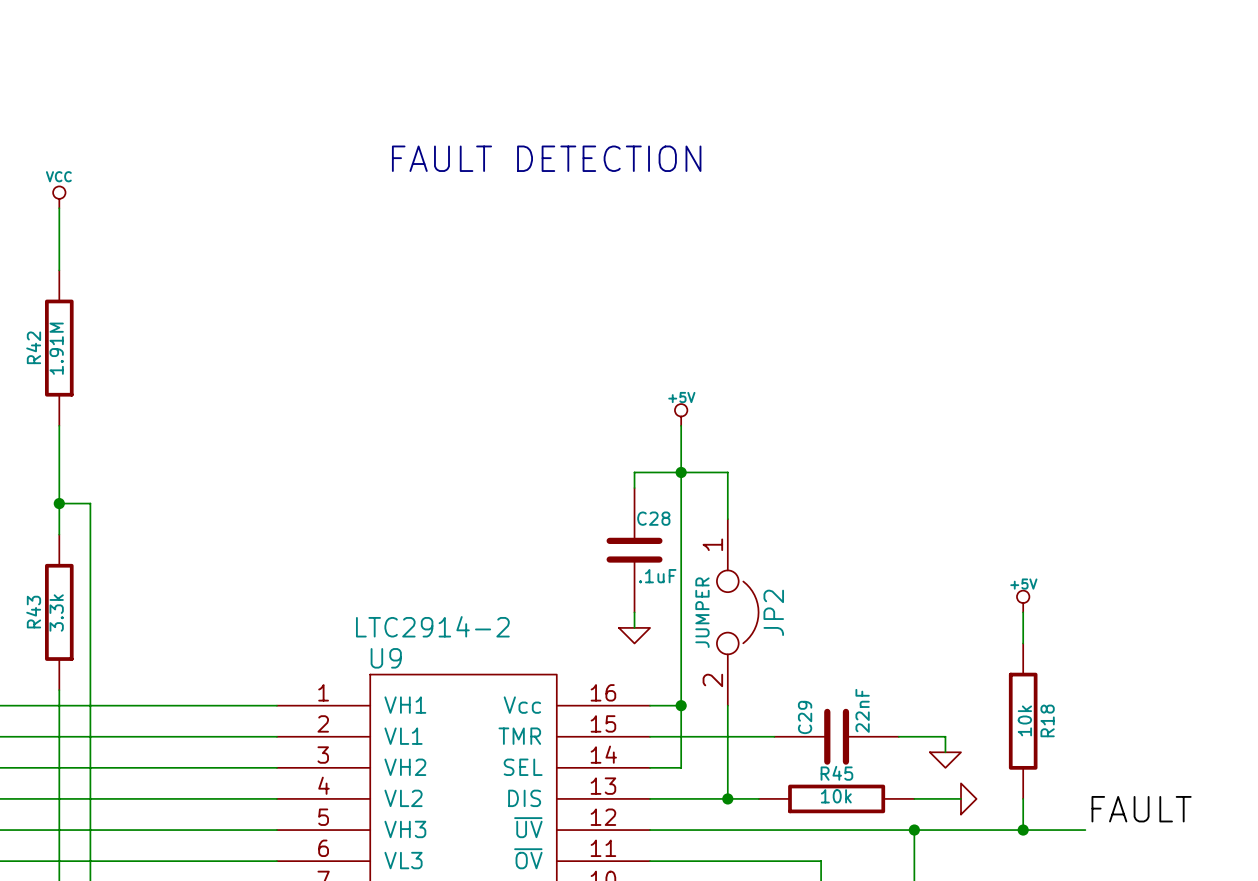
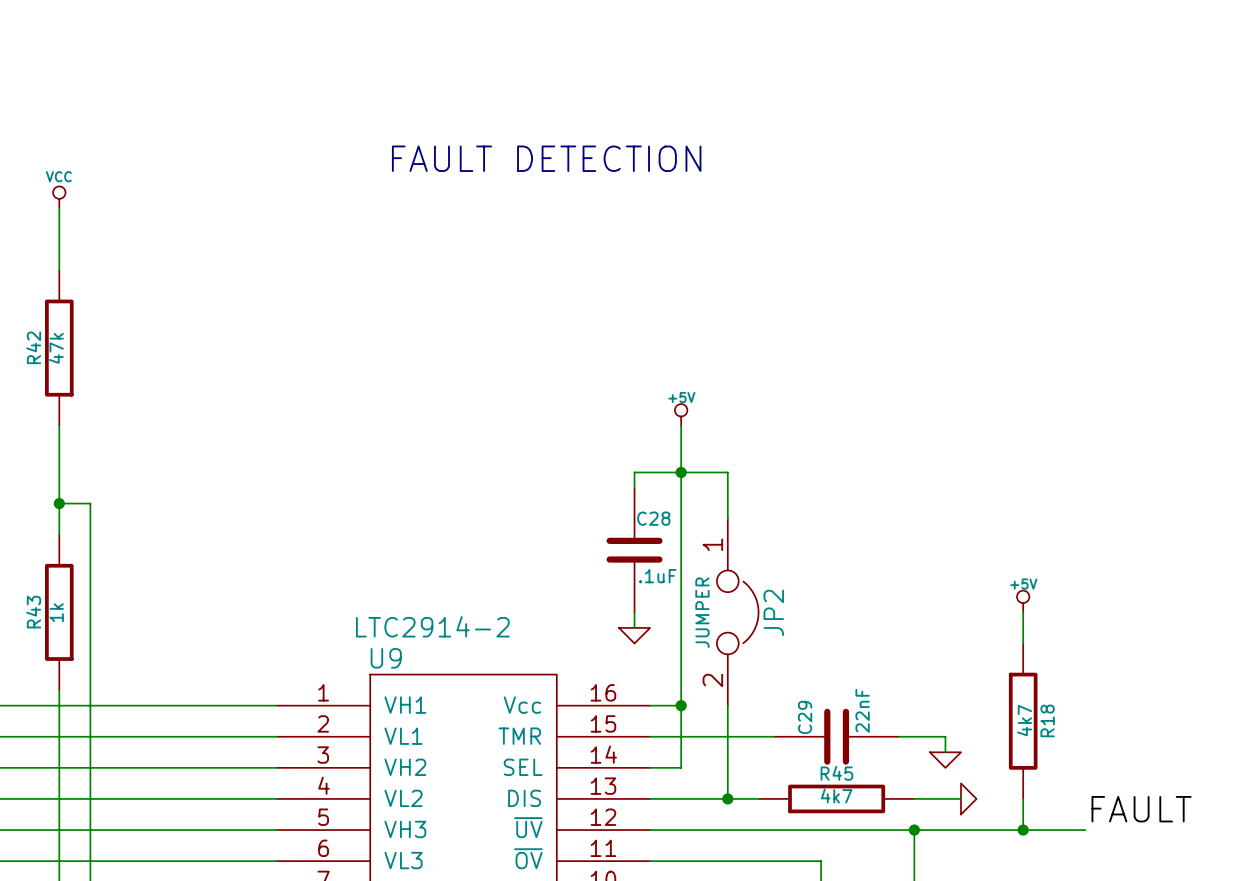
R42 value: 1.91M (56, 348) -> 47k (56, 348)
R43 value: 3.3k (56, 612) -> 1k (56, 612)
R18 value: 10k (1024, 720) -> 4k7 (1024, 720)
R45 value: 10k (836, 796) -> 4k7 (836, 796)

